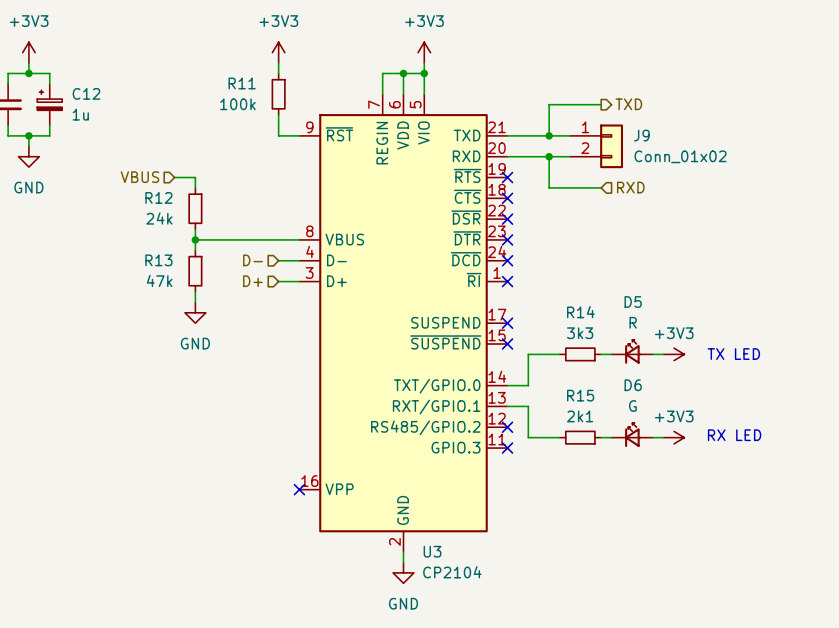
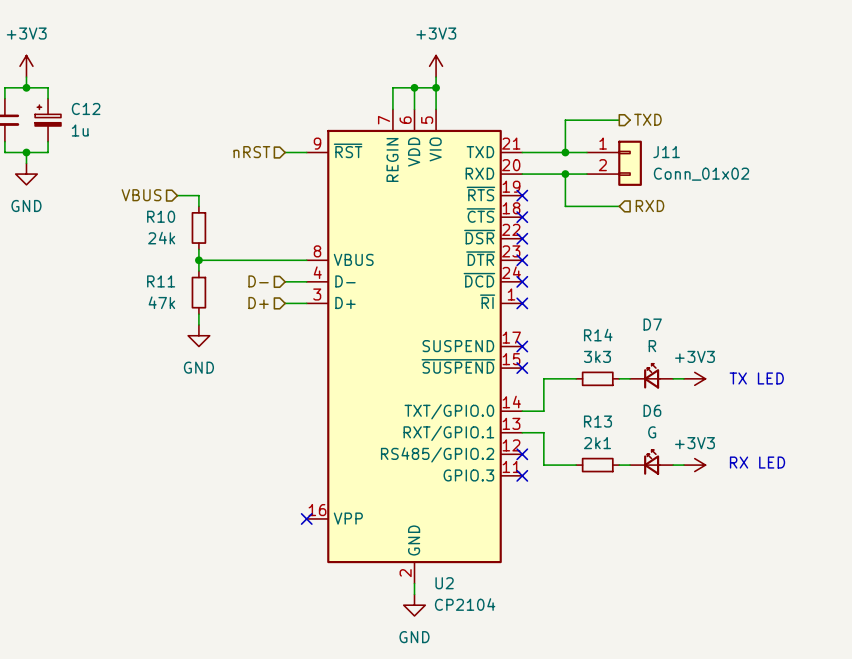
power symbol: +3V3 (278, 52) -> none
wire: (278, 63) (278, 73) -> none
R11: 100k (278, 94) -> none
wire: (278, 115) (278, 135) -> none
hierarchical label: none -> nRST (251, 152)
J9 name: J9 (641, 135) -> J11 (666, 152)
R12 name: R12 (158, 197) -> R10 (161, 216)
R13 name: R13 (158, 260) -> R11 (161, 281)
D5 name: D5 (633, 301) -> D7 (652, 324)
R15 name: R15 (580, 395) -> R13 (597, 421)
U3 name: U3 (432, 551) -> U2 (444, 583)

